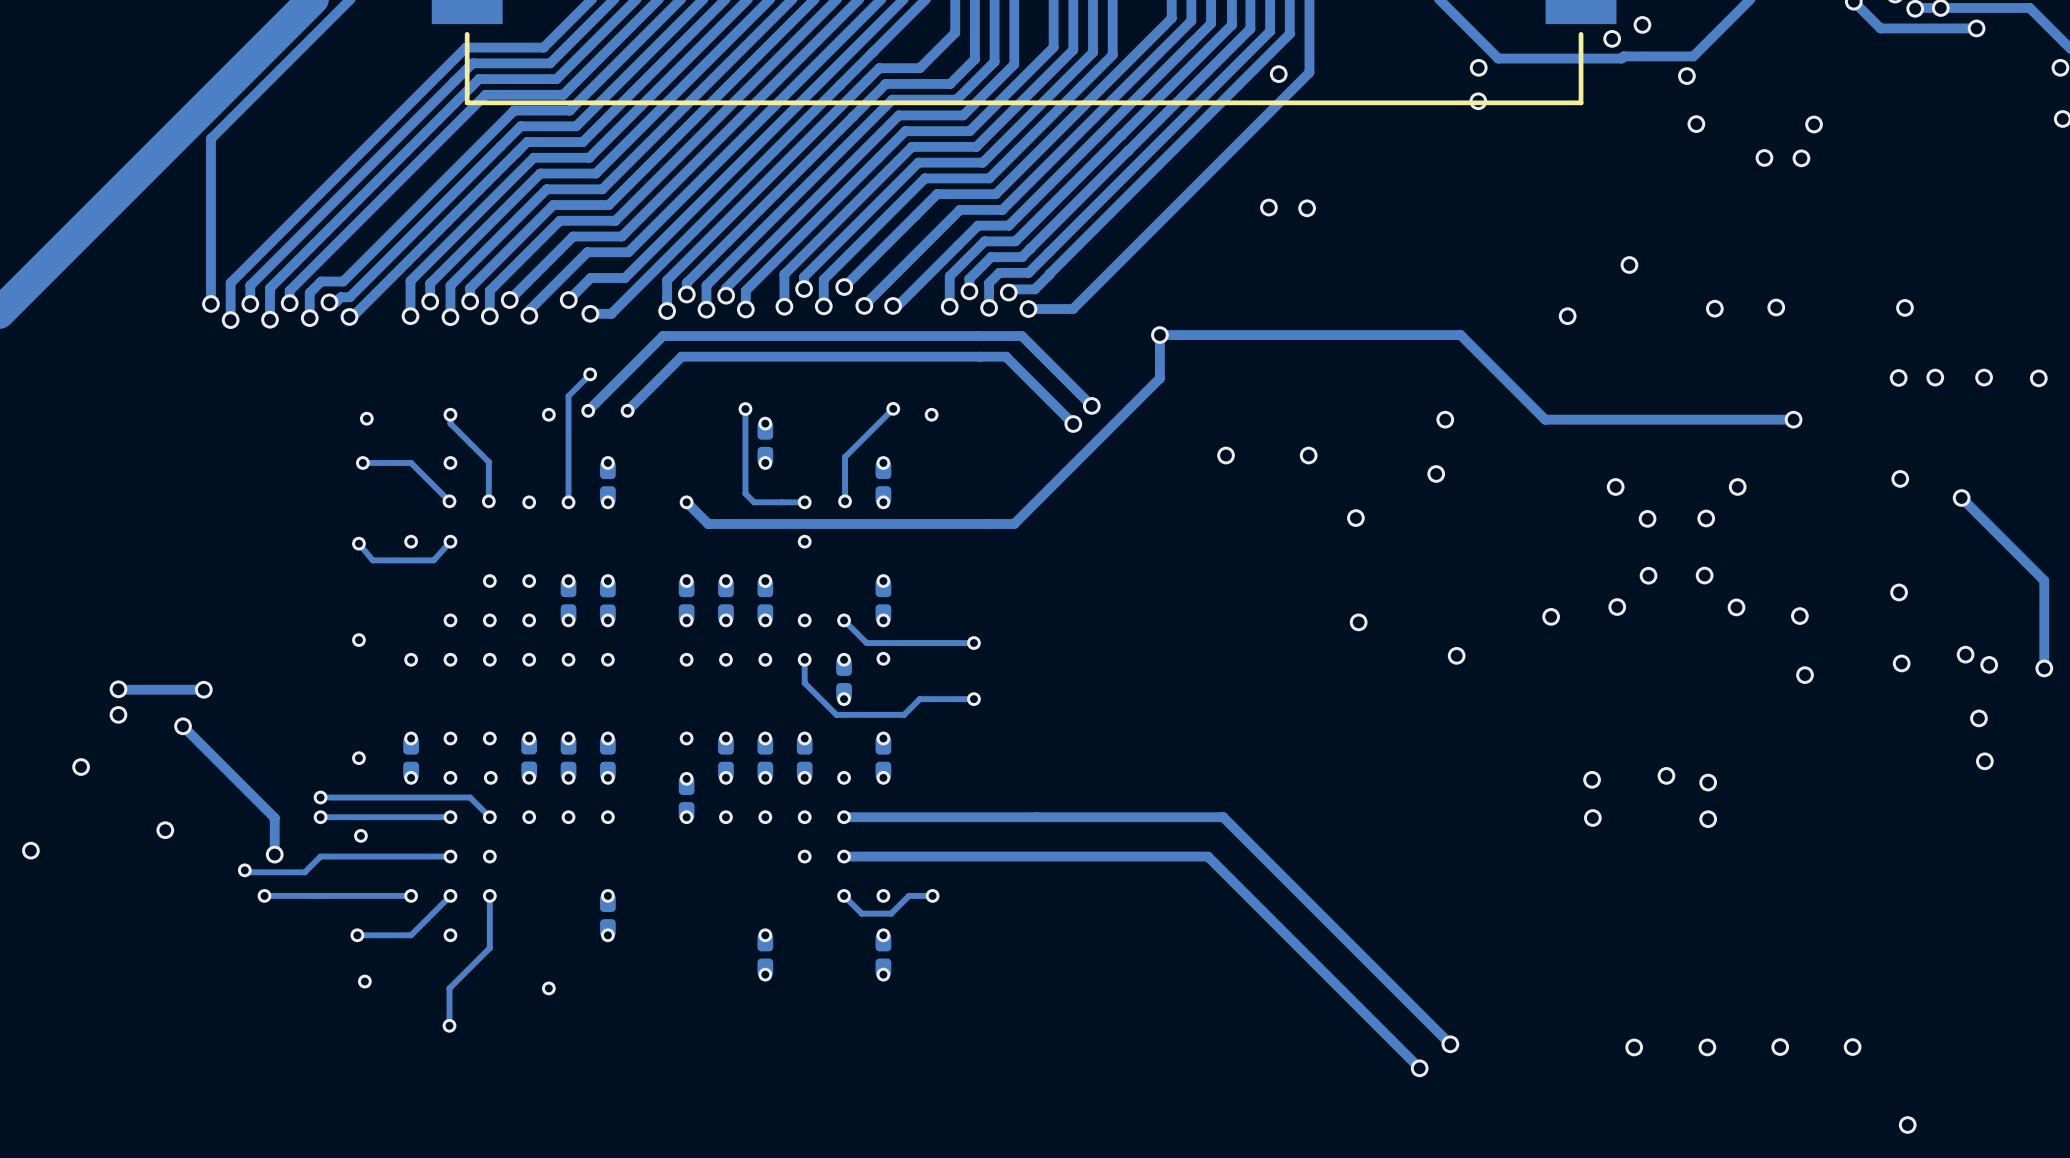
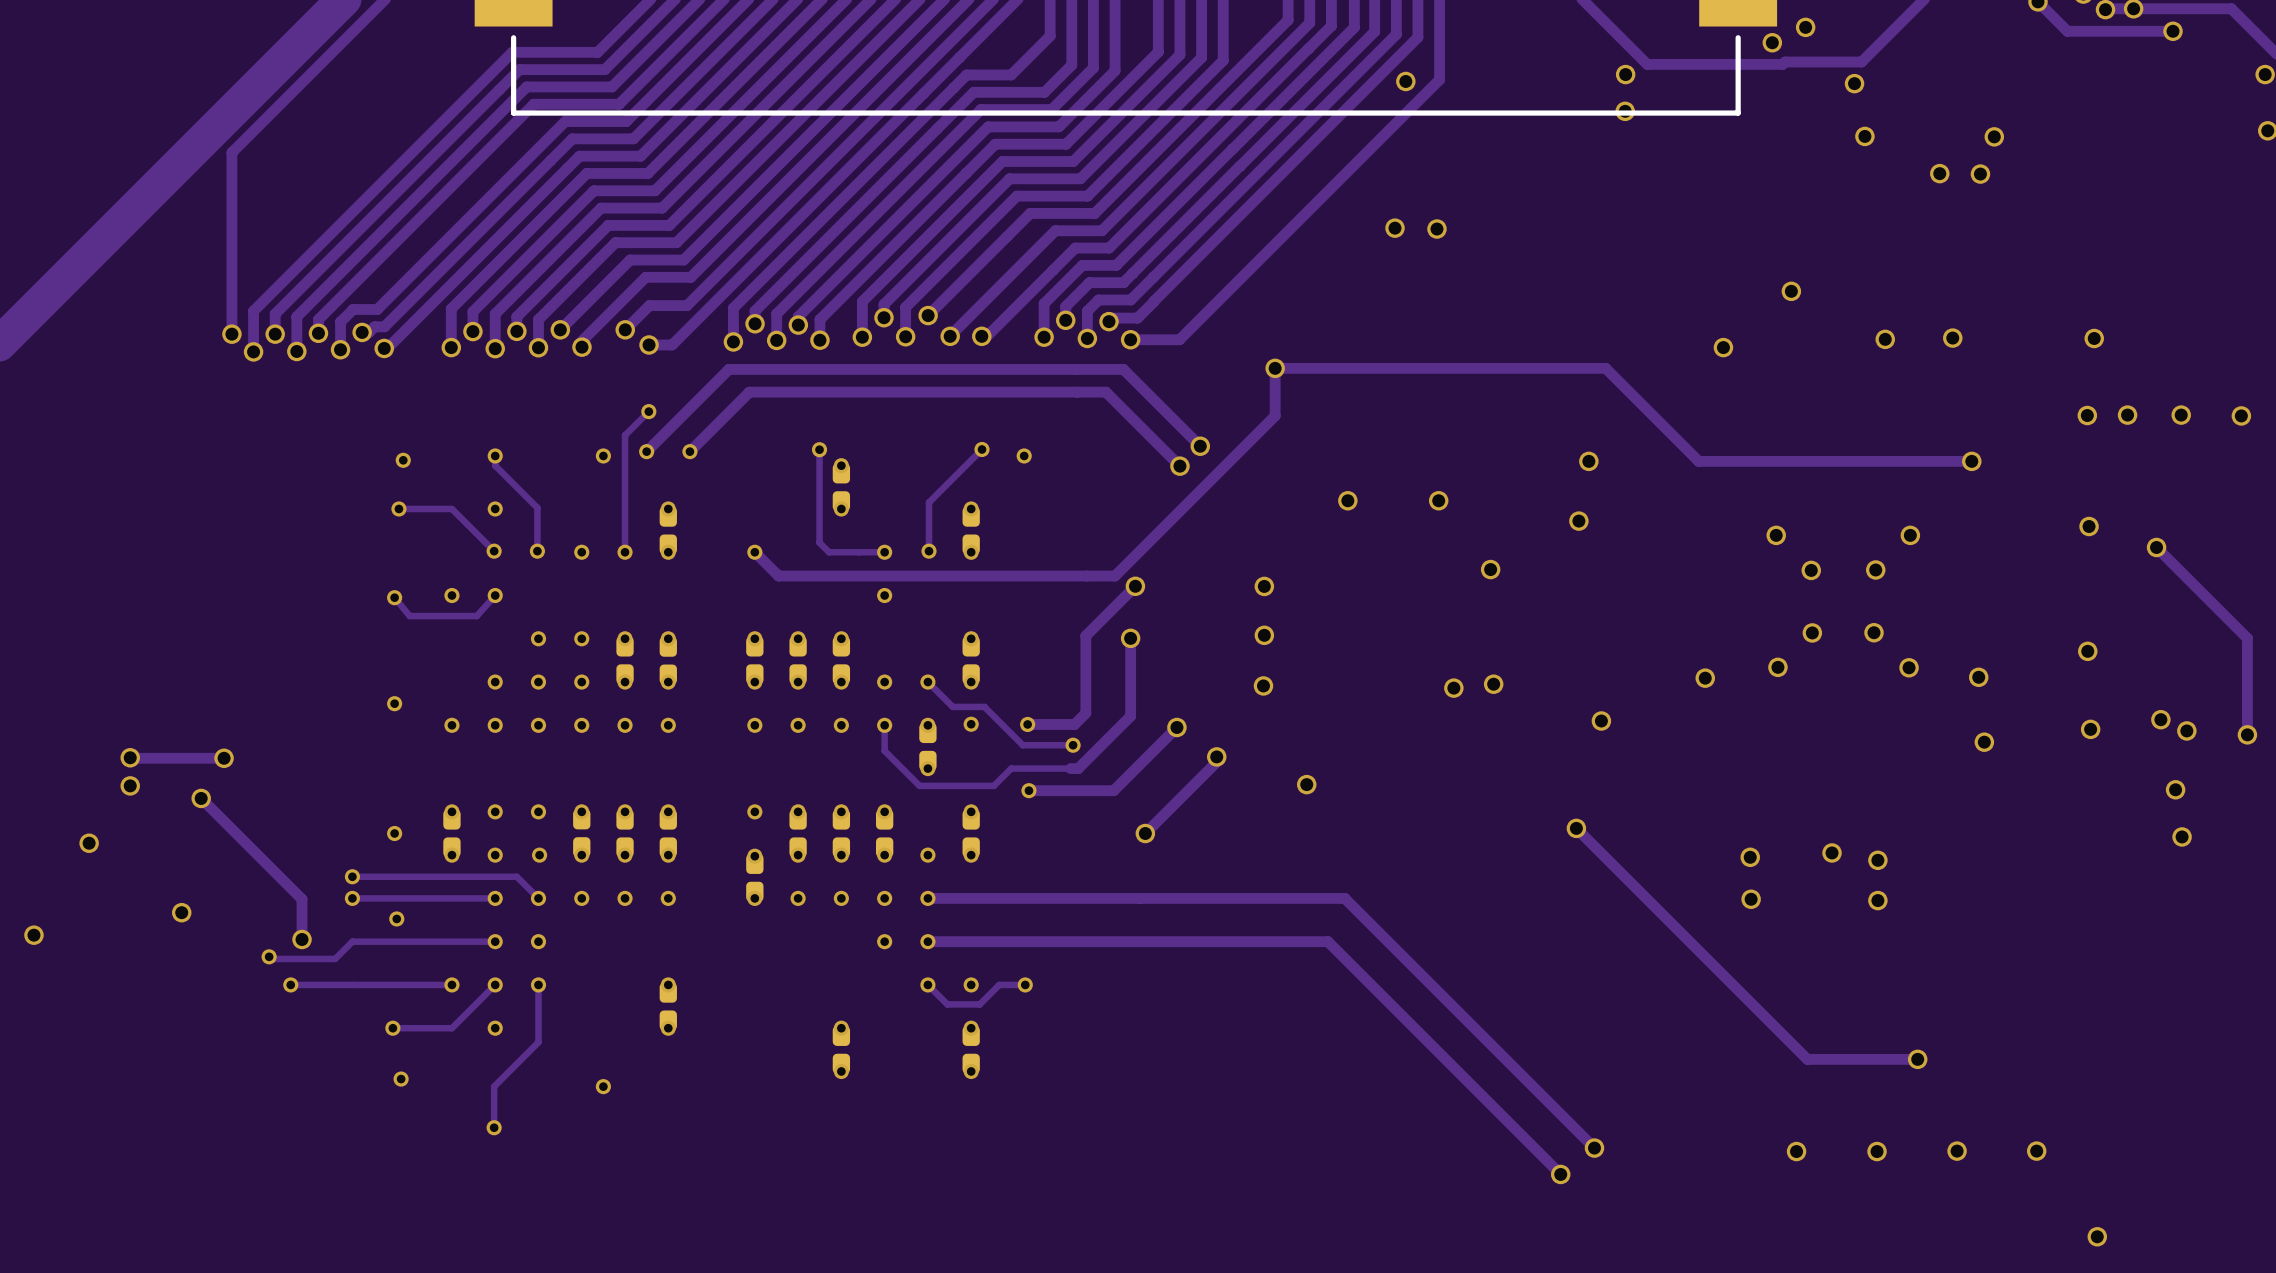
track: none -> (1135, 586) (1085, 635) (1085, 713) (1074, 724) (1027, 724)
via: none -> (1135, 586)
via: none -> (1264, 586)
via: none -> (1264, 635)
track: none -> (1130, 638) (1130, 716) (1078, 768) (1070, 768)
via: none -> (1130, 638)
via: none -> (1263, 685)
via: none -> (1453, 688)
track: (973, 643) (895, 643) -> (1073, 745) (1022, 745) (984, 706)
via: (973, 643) -> none
via: none -> (1027, 724)
track: none -> (1176, 727) (1113, 790) (1028, 790)
via: none -> (1176, 727)
via: none -> (1073, 745)
track: none -> (1216, 756) (1216, 762) (1145, 833)
via: none -> (1216, 756)
via: (973, 699) -> none
via: none -> (1306, 784)
via: none -> (1028, 790)
track: none -> (1576, 828) (1807, 1059) (1917, 1059)
via: none -> (1576, 828)
via: none -> (1145, 833)
via: none -> (1917, 1059)

